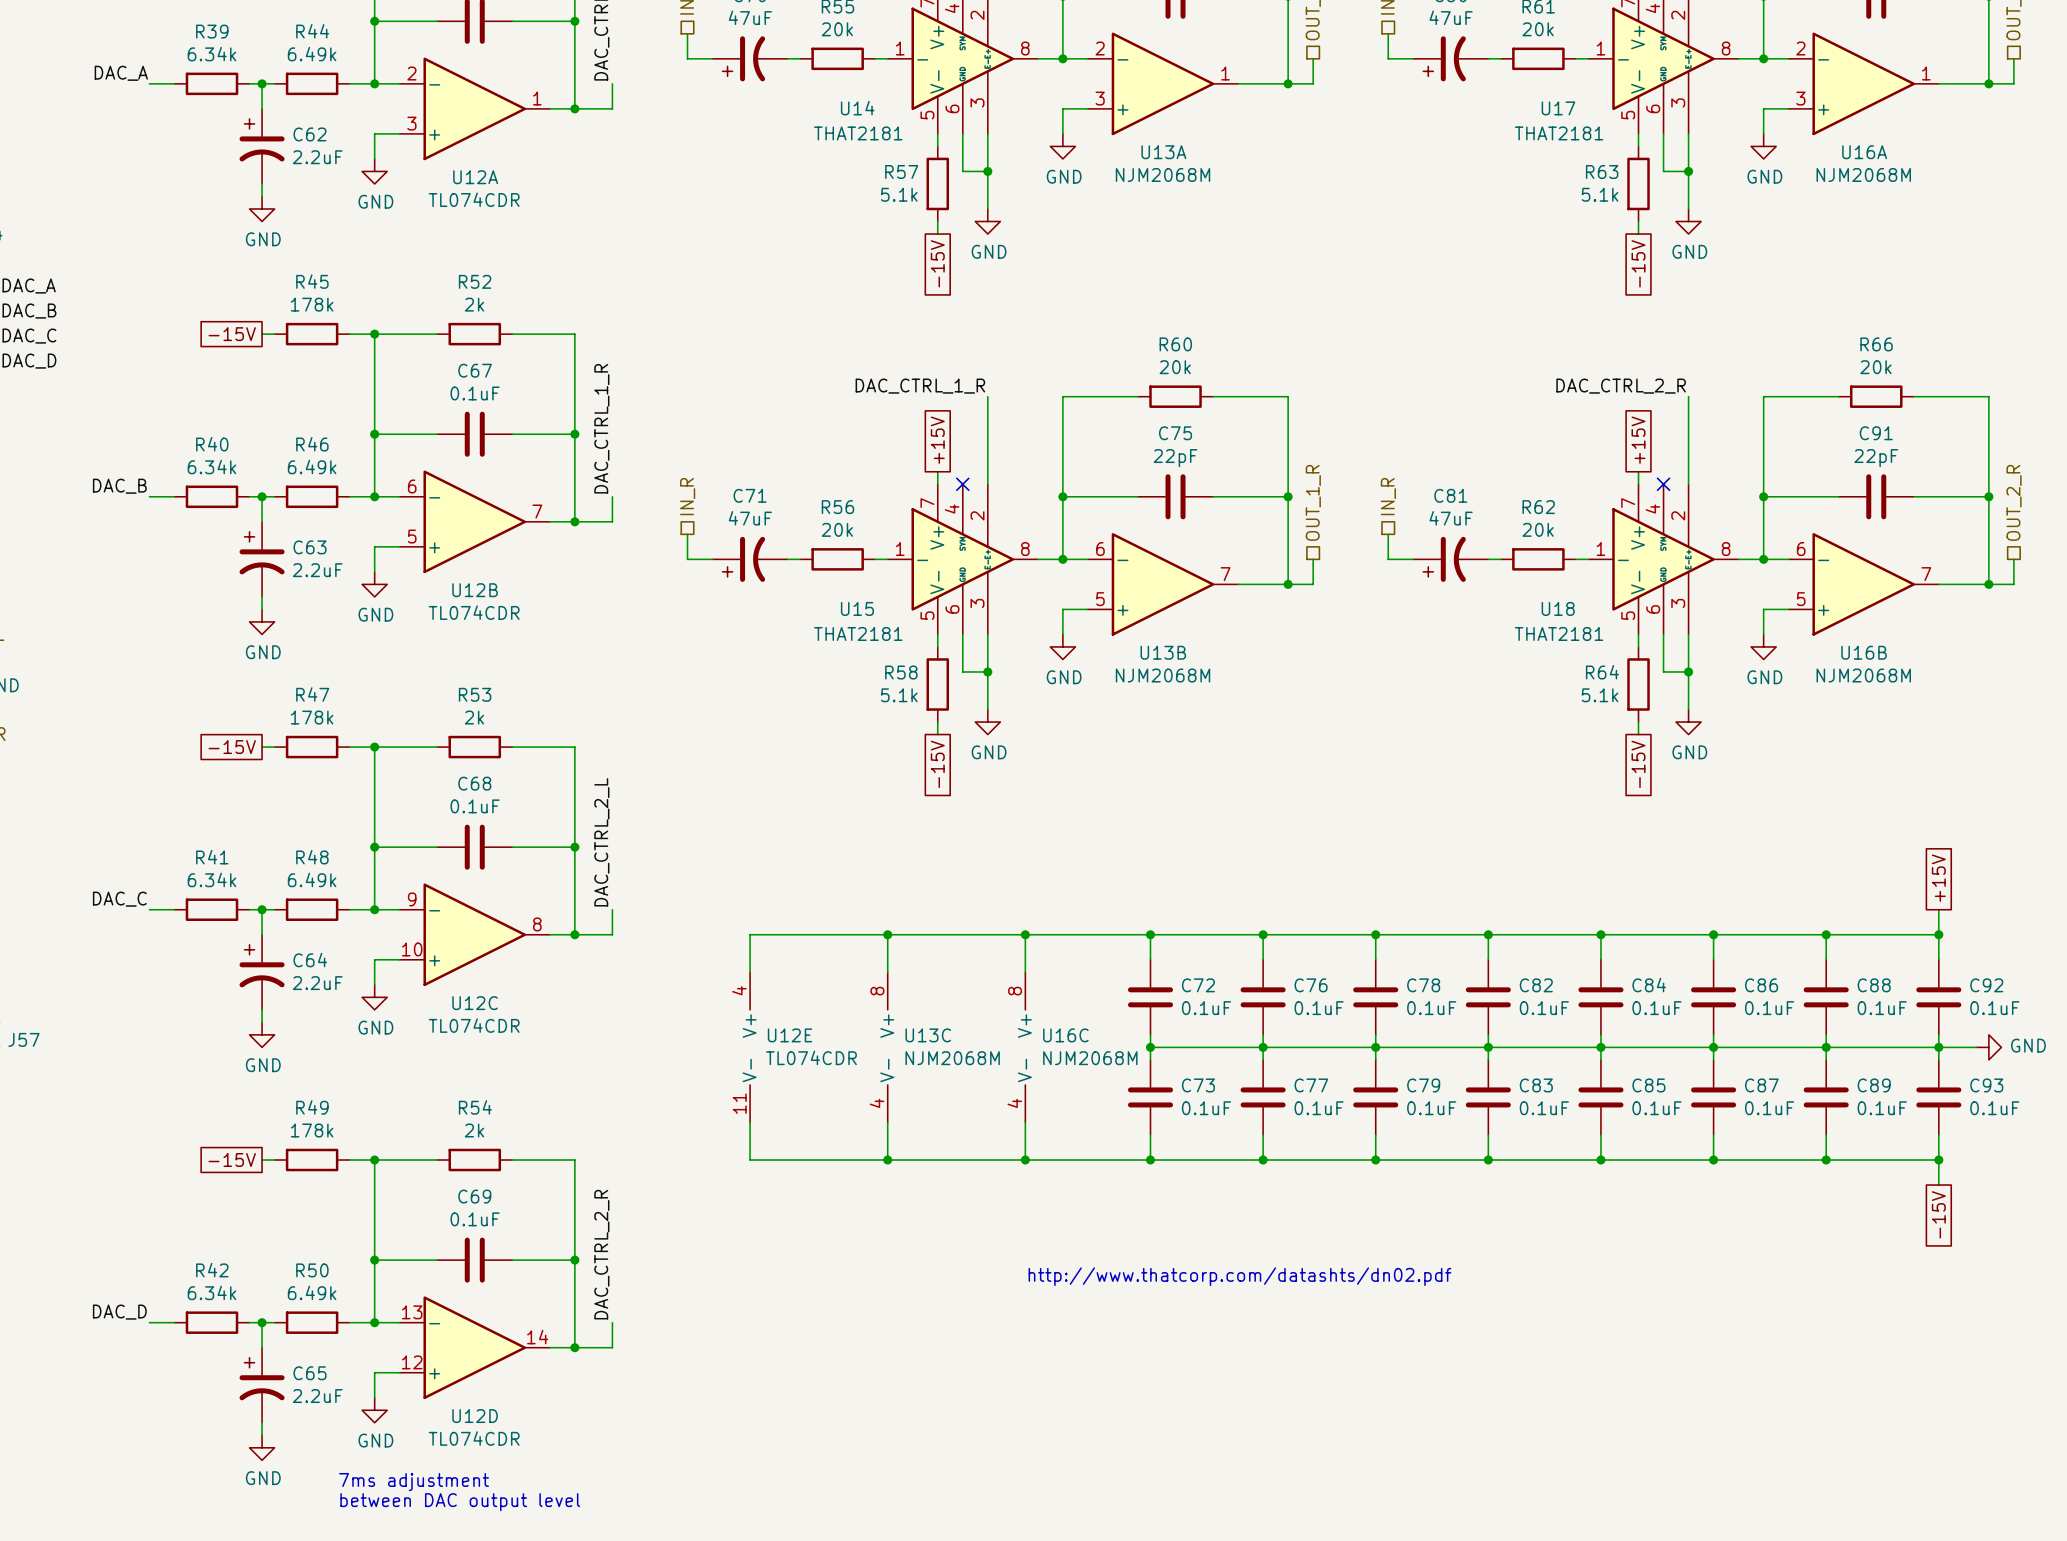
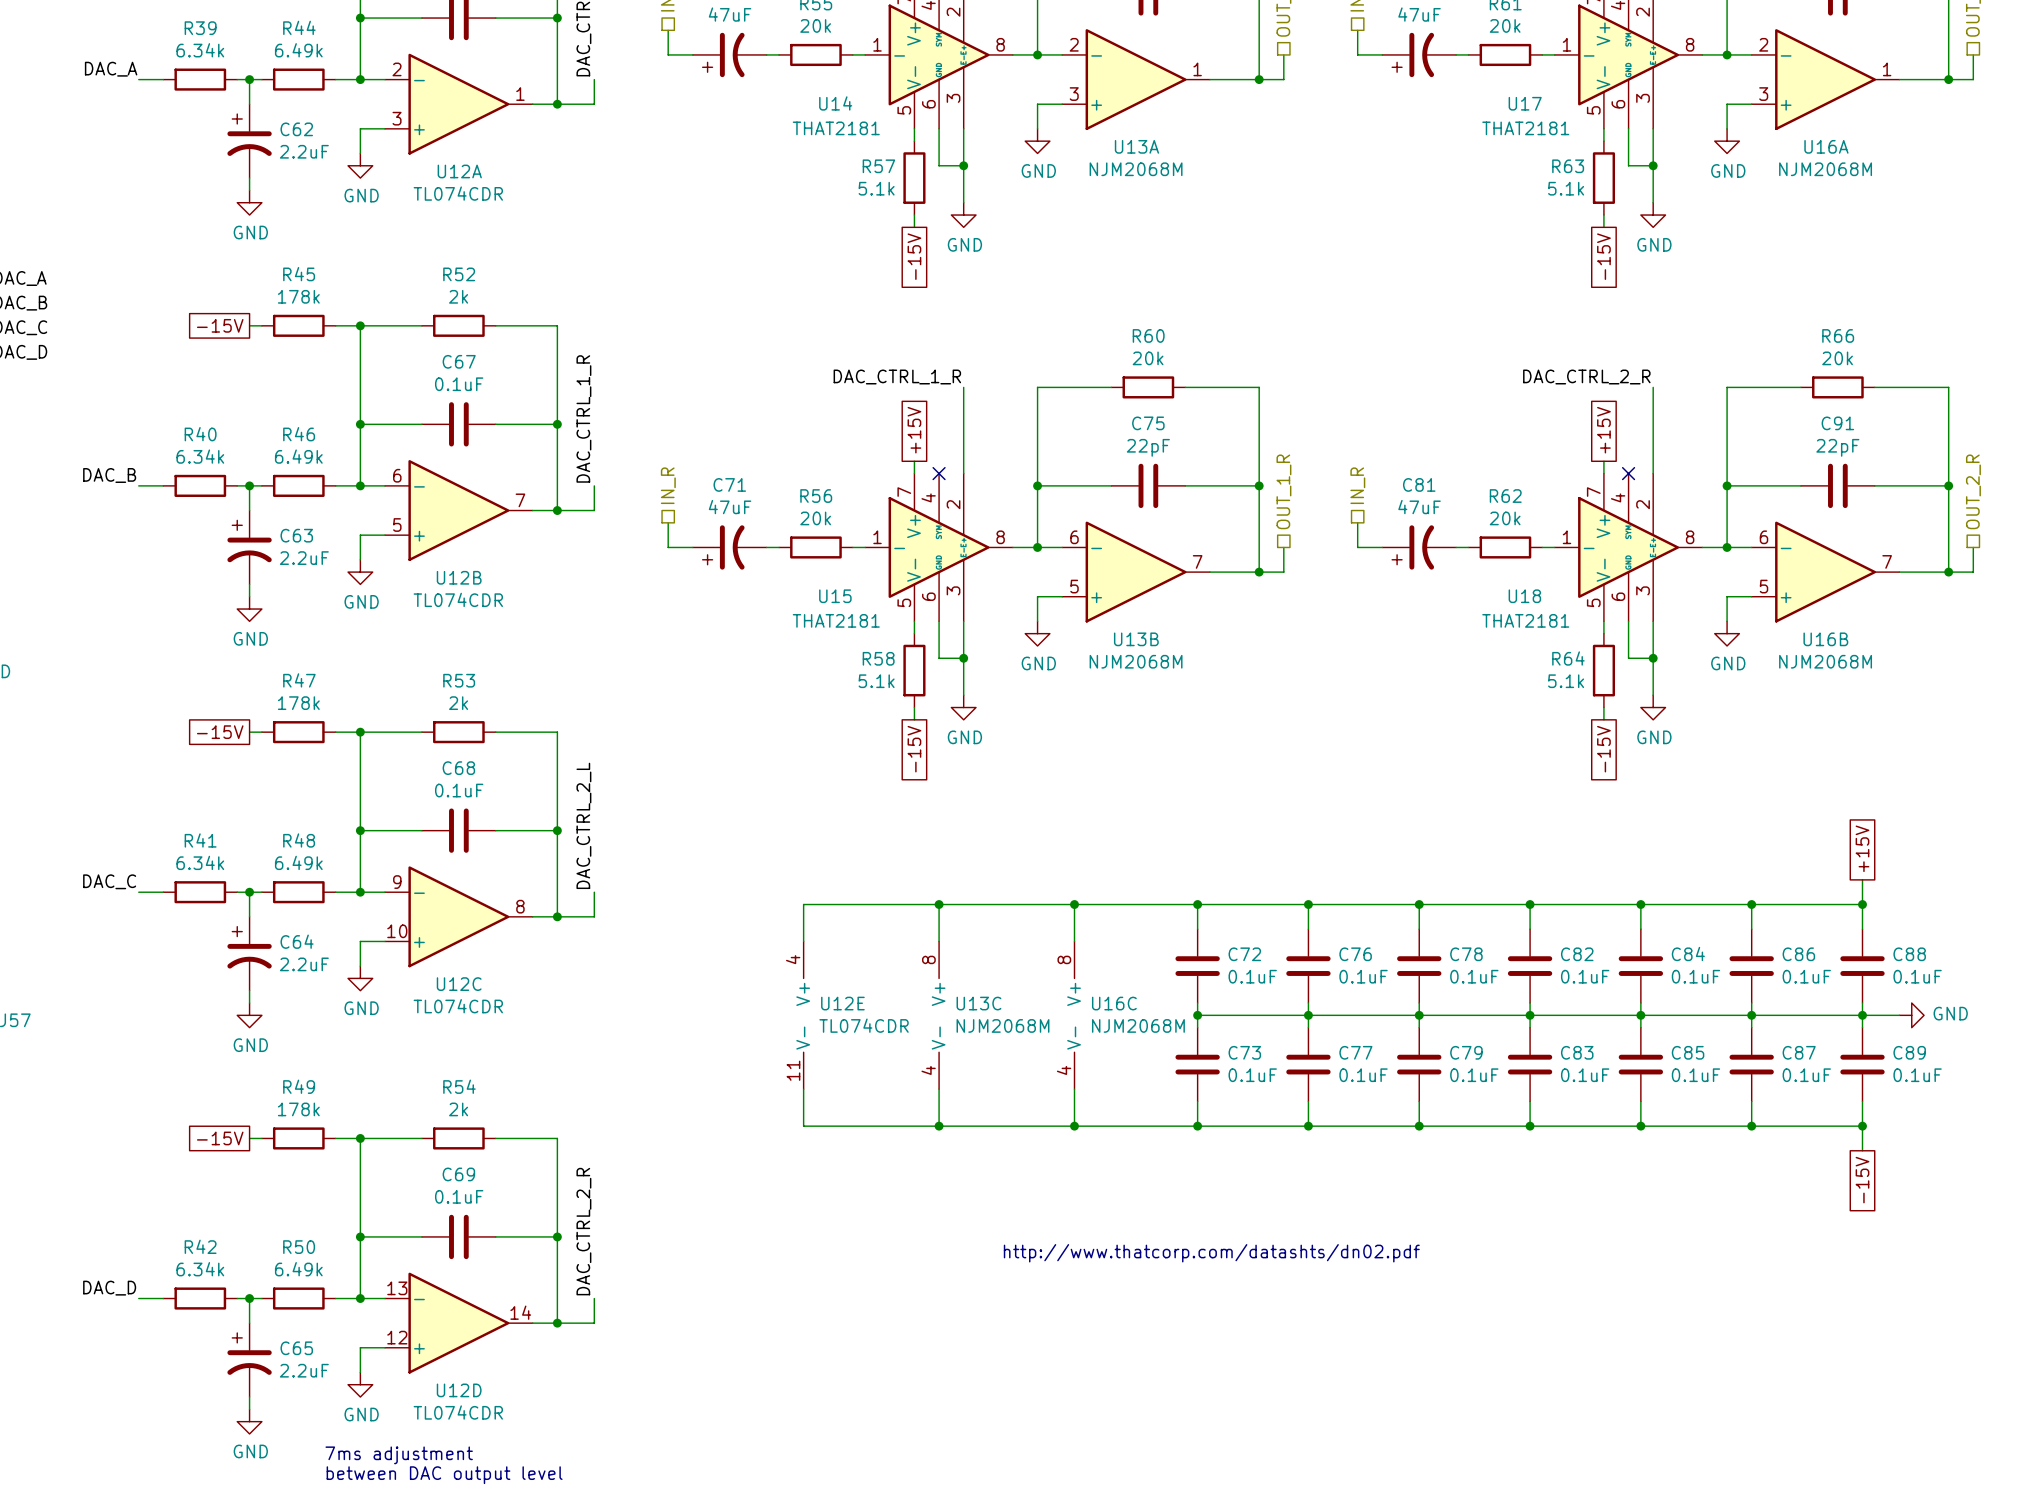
global label position: +15V (1938, 878) -> +15V (1862, 848)
wire: (1938, 909) (1938, 959) -> (1862, 879) (1862, 929)
junction: none -> (939, 904)
junction: none -> (1074, 904)
junction: none -> (1197, 904)
junction: none -> (1308, 904)
junction: none -> (1419, 904)
junction: none -> (1530, 904)
junction: none -> (1640, 904)
junction: none -> (1751, 904)
wire: none -> (1862, 904) (803, 904) (803, 941)
junction: none -> (1862, 904)
wire: (887, 934) (887, 972) -> (939, 904) (939, 941)
junction: (887, 934) -> none
wire: (1025, 934) (1025, 972) -> (1074, 904) (1074, 941)
junction: (1025, 934) -> none
wire: (1150, 934) (1150, 959) -> (1197, 904) (1197, 929)
junction: (1150, 934) -> none
wire: (1263, 934) (1263, 959) -> (1308, 904) (1308, 929)
junction: (1263, 934) -> none
wire: (1375, 934) (1375, 959) -> (1419, 904) (1419, 929)
junction: (1375, 934) -> none
wire: (1488, 934) (1488, 959) -> (1530, 904) (1530, 929)
junction: (1488, 934) -> none
wire: (1600, 934) (1600, 959) -> (1640, 904) (1640, 929)
junction: (1600, 934) -> none
wire: (1713, 934) (1713, 959) -> (1751, 904) (1751, 929)
junction: (1713, 934) -> none
wire: (1826, 934) (1826, 959) -> none
junction: (1826, 934) -> none
wire: (1938, 934) (750, 934) (750, 972) -> none
junction: (1938, 934) -> none
C72 position: (1150, 997) -> (1197, 966)
C76 position: (1263, 997) -> (1308, 966)
C78 position: (1375, 997) -> (1419, 966)
C82 position: (1488, 997) -> (1530, 966)
C84 position: (1600, 997) -> (1640, 966)
C86 position: (1713, 997) -> (1751, 966)
C88 position: (1826, 997) -> (1862, 966)
C92: 0.1uF (1938, 997) -> none
wire: (1150, 1034) (1150, 1059) -> (1197, 1003) (1197, 1027)
junction: none -> (1197, 1015)
wire: (1263, 1034) (1263, 1059) -> (1308, 1003) (1308, 1027)
junction: none -> (1308, 1015)
wire: (1375, 1034) (1375, 1059) -> (1419, 1003) (1419, 1027)
junction: none -> (1419, 1015)
wire: (1488, 1034) (1488, 1059) -> (1530, 1003) (1530, 1027)
junction: none -> (1530, 1015)
wire: (1600, 1034) (1600, 1059) -> (1640, 1003) (1640, 1027)
junction: none -> (1640, 1015)
wire: (1713, 1034) (1713, 1059) -> (1751, 1003) (1751, 1027)
junction: none -> (1751, 1015)
wire: (1826, 1034) (1826, 1059) -> (1862, 1003) (1862, 1027)
junction: none -> (1862, 1015)
wire: (1938, 1034) (1938, 1059) -> (1899, 1015) (1197, 1015)
U12E position: (750, 1047) -> (803, 1015)
U13C position: (887, 1047) -> (939, 1015)
U16C position: (1025, 1047) -> (1074, 1015)
wire: (1150, 1047) (1976, 1047) -> none
junction: (1150, 1047) -> none
junction: (1263, 1047) -> none
junction: (1375, 1047) -> none
junction: (1488, 1047) -> none
junction: (1600, 1047) -> none
junction: (1713, 1047) -> none
junction: (1826, 1047) -> none
junction: (1938, 1047) -> none
power symbol position: GND (1988, 1047) -> GND (1911, 1015)
C73 position: (1150, 1097) -> (1197, 1064)
C77 position: (1263, 1097) -> (1308, 1064)
C79 position: (1375, 1097) -> (1419, 1064)
C83 position: (1488, 1097) -> (1530, 1064)
C85 position: (1600, 1097) -> (1640, 1064)
C87 position: (1713, 1097) -> (1751, 1064)
C89 position: (1826, 1097) -> (1862, 1064)
C93: 0.1uF (1938, 1097) -> none
wire: none -> (803, 1089) (803, 1126) (1862, 1126)
wire: (750, 1122) (750, 1160) (1938, 1160) -> none
wire: (887, 1122) (887, 1160) -> (939, 1089) (939, 1126)
wire: (1025, 1122) (1025, 1160) -> (1074, 1089) (1074, 1126)
wire: (1150, 1134) (1150, 1160) -> (1197, 1101) (1197, 1126)
wire: (1263, 1134) (1263, 1160) -> (1308, 1101) (1308, 1126)
wire: (1375, 1134) (1375, 1160) -> (1419, 1101) (1419, 1126)
wire: (1488, 1134) (1488, 1160) -> (1530, 1101) (1530, 1126)
wire: (1600, 1134) (1600, 1160) -> (1640, 1101) (1640, 1126)
wire: (1713, 1134) (1713, 1160) -> (1751, 1101) (1751, 1126)
wire: (1826, 1134) (1826, 1160) -> none
wire: (1938, 1134) (1938, 1185) -> (1862, 1101) (1862, 1150)
junction: none -> (939, 1126)
junction: none -> (1074, 1126)
junction: none -> (1197, 1126)
junction: none -> (1308, 1126)
junction: none -> (1419, 1126)
junction: none -> (1530, 1126)
junction: none -> (1640, 1126)
junction: none -> (1751, 1126)
junction: none -> (1862, 1126)
junction: (887, 1160) -> none
junction: (1025, 1160) -> none
junction: (1150, 1160) -> none
junction: (1263, 1160) -> none
junction: (1375, 1160) -> none
junction: (1488, 1160) -> none
junction: (1600, 1160) -> none
junction: (1713, 1160) -> none
junction: (1826, 1160) -> none
junction: (1938, 1160) -> none
global label position: -15V (1938, 1214) -> -15V (1862, 1180)

